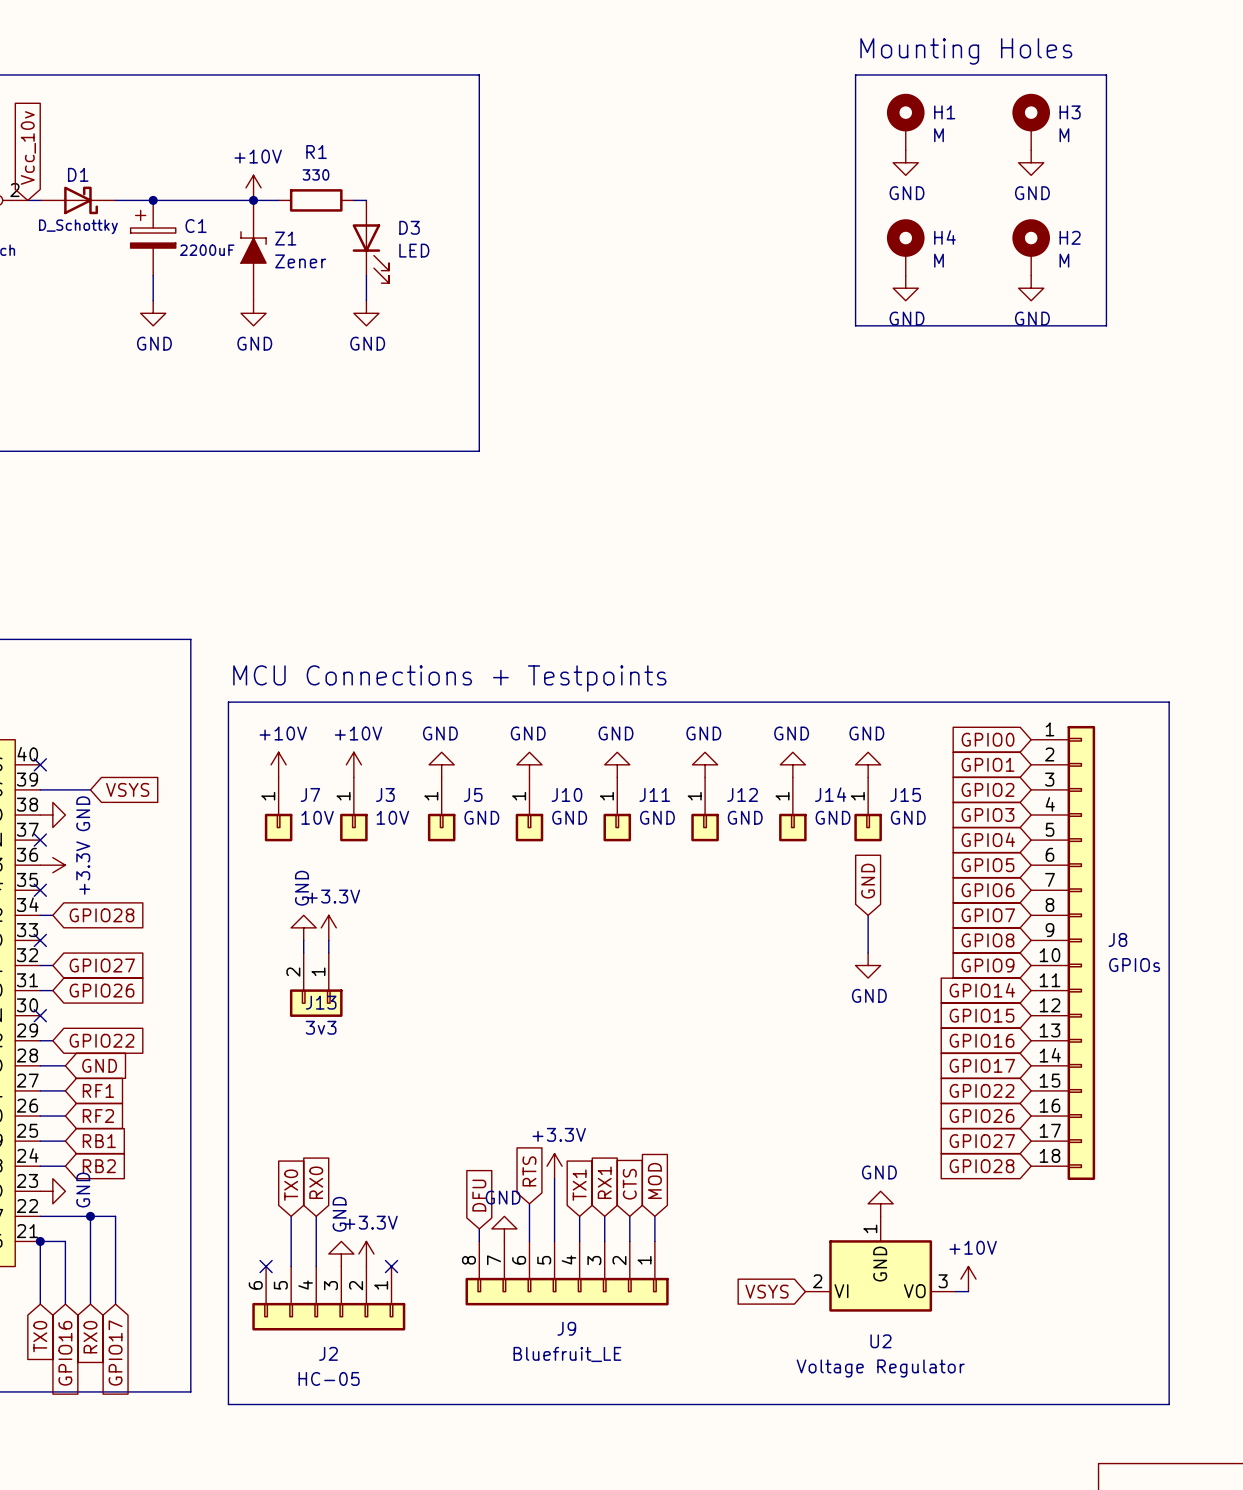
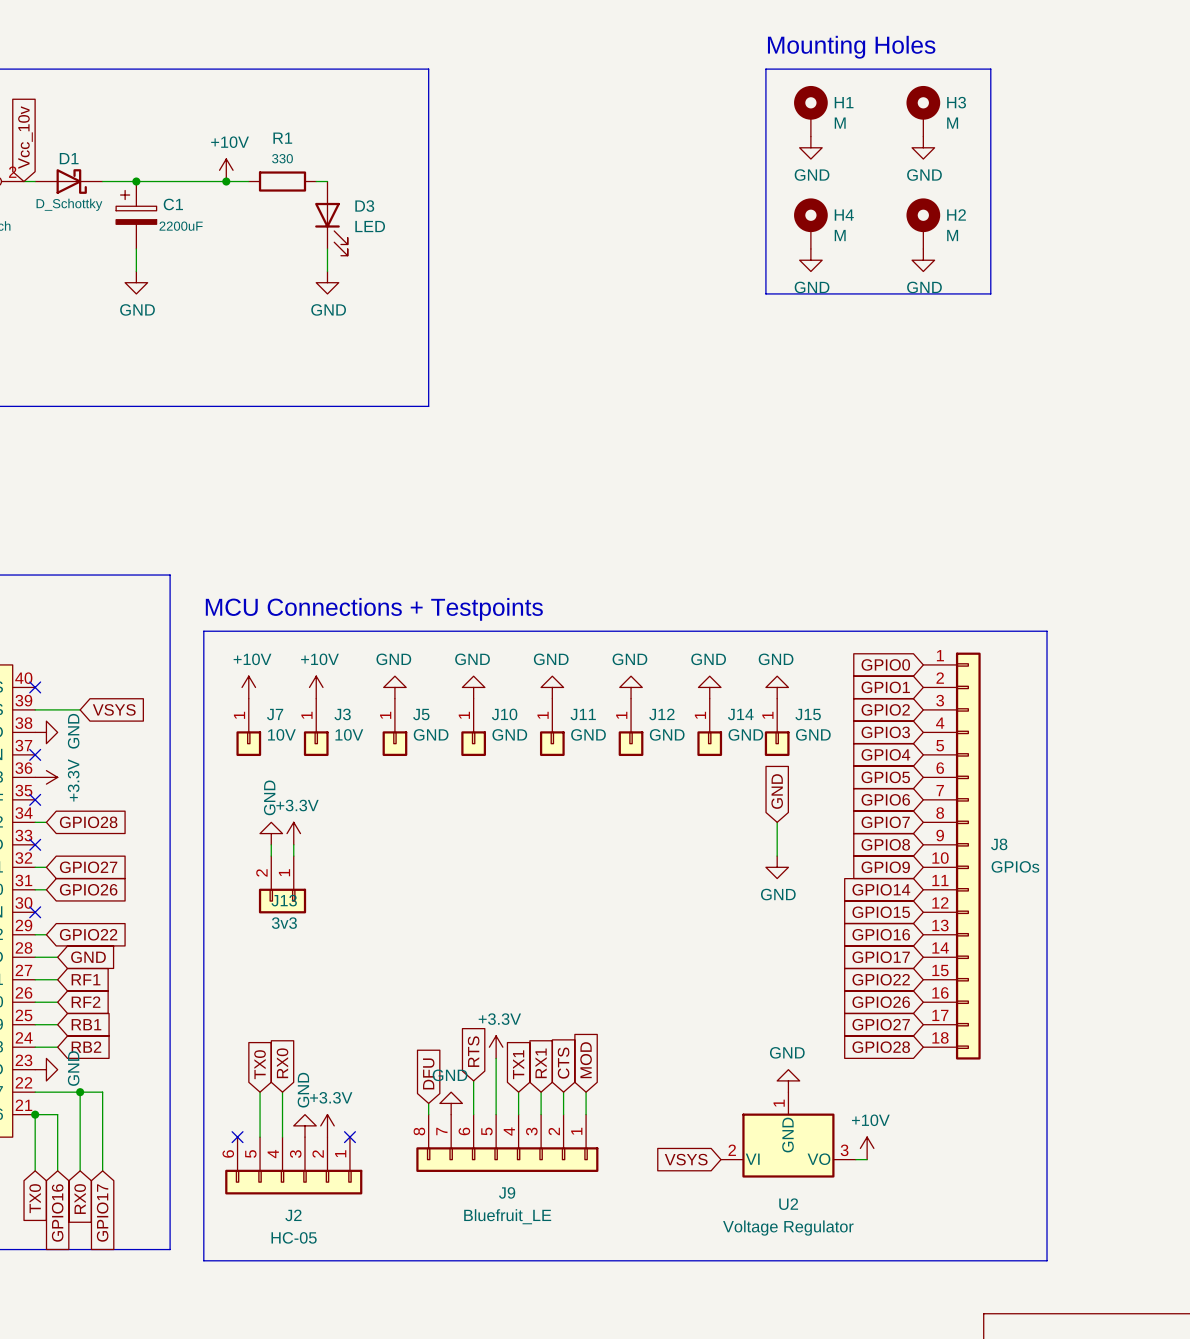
Z1: Zener (253, 250) -> none
power symbol: GND (253, 313) -> none

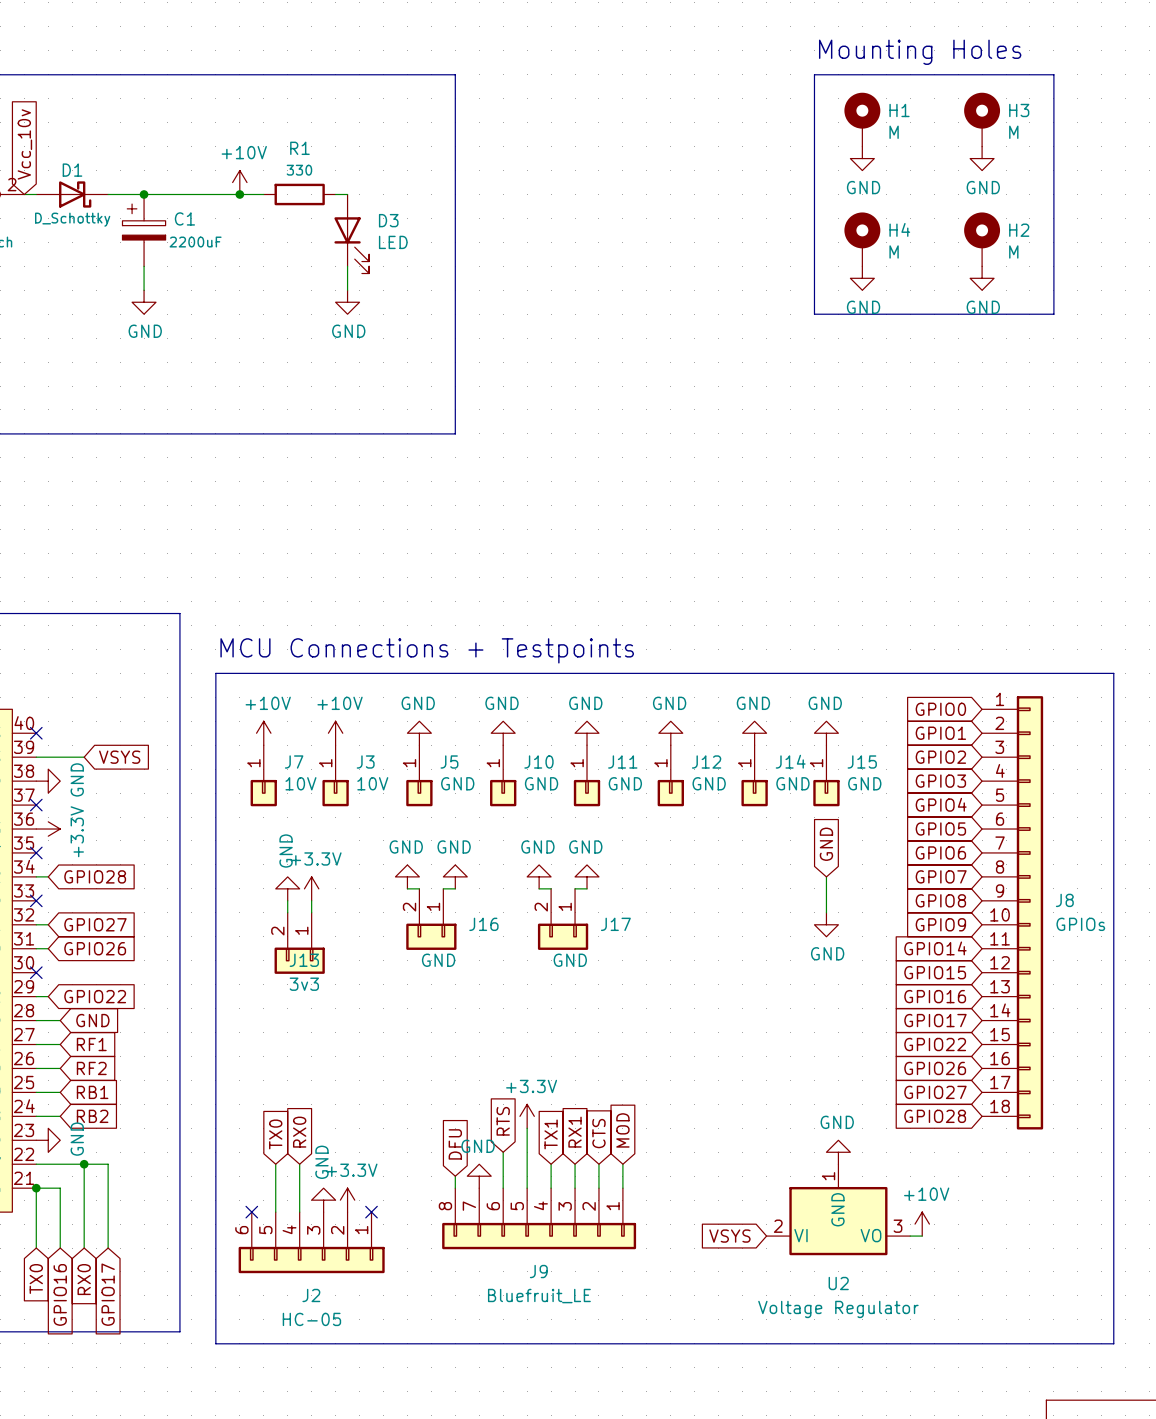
power symbol: none -> GND (407, 876)
power symbol: none -> GND (455, 876)
power symbol: none -> GND (539, 876)
power symbol: none -> GND (587, 876)
wire: none -> (407, 888) (419, 888)
wire: none -> (443, 888) (455, 888)
wire: none -> (539, 888) (551, 888)
wire: none -> (575, 888) (587, 888)
J16: none -> GND (431, 919)
J17: none -> GND (563, 919)

